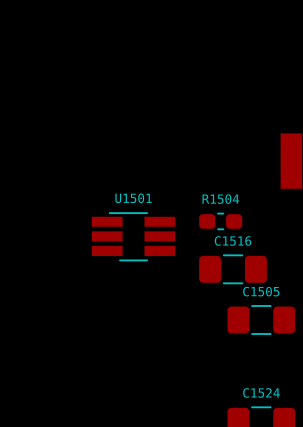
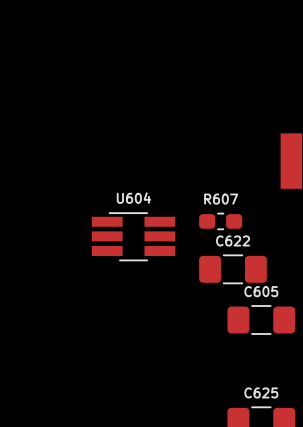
U1501 name: U1501 (133, 198) -> U604 (133, 198)
R1504 name: R1504 (220, 199) -> R607 (221, 199)
C1516 name: C1516 (233, 240) -> C622 (233, 240)
C1505 name: C1505 (261, 291) -> C605 (261, 291)
C1524 name: C1524 (261, 392) -> C625 (261, 392)

